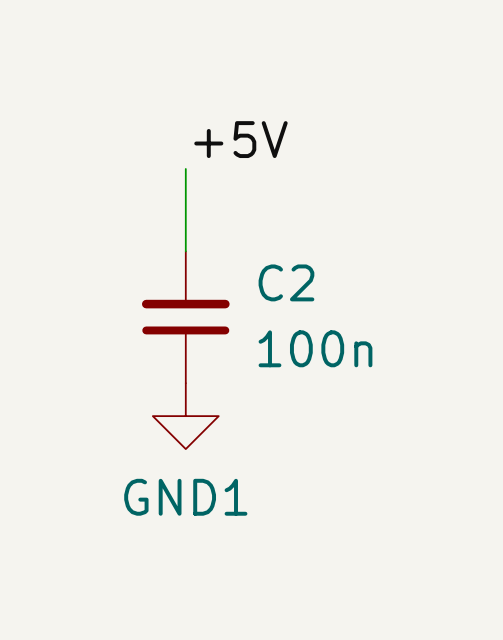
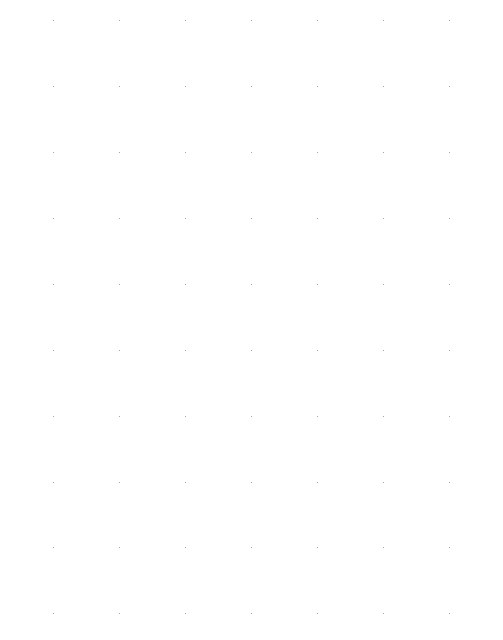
label: +5V (240, 139) -> none
wire: (185, 168) (185, 251) -> none
C2: 100n (185, 317) -> none
power symbol: GND1 (185, 416) -> none

